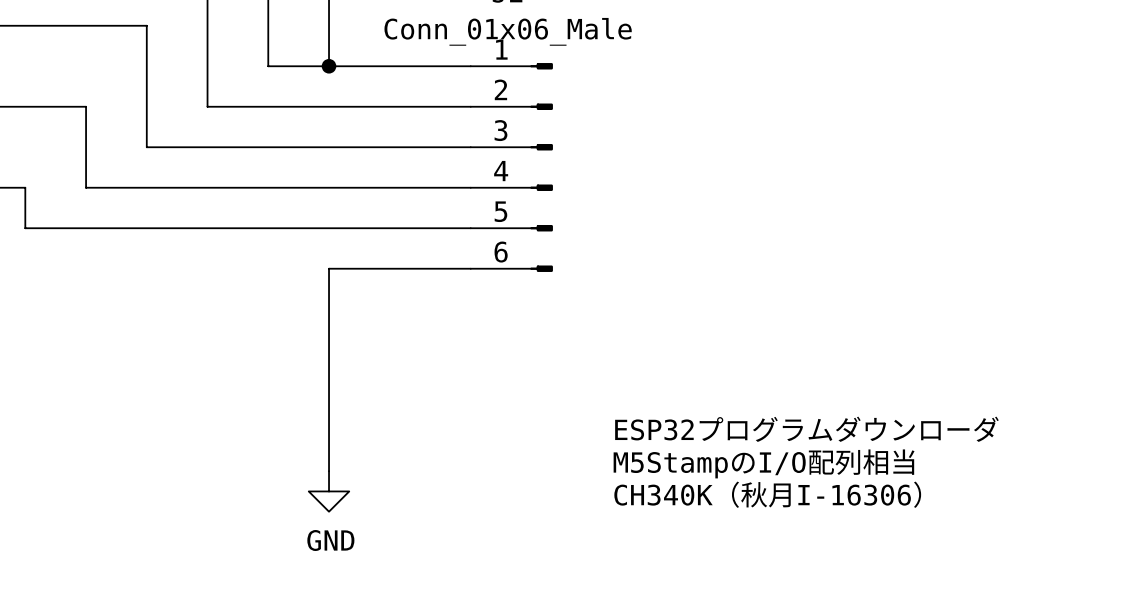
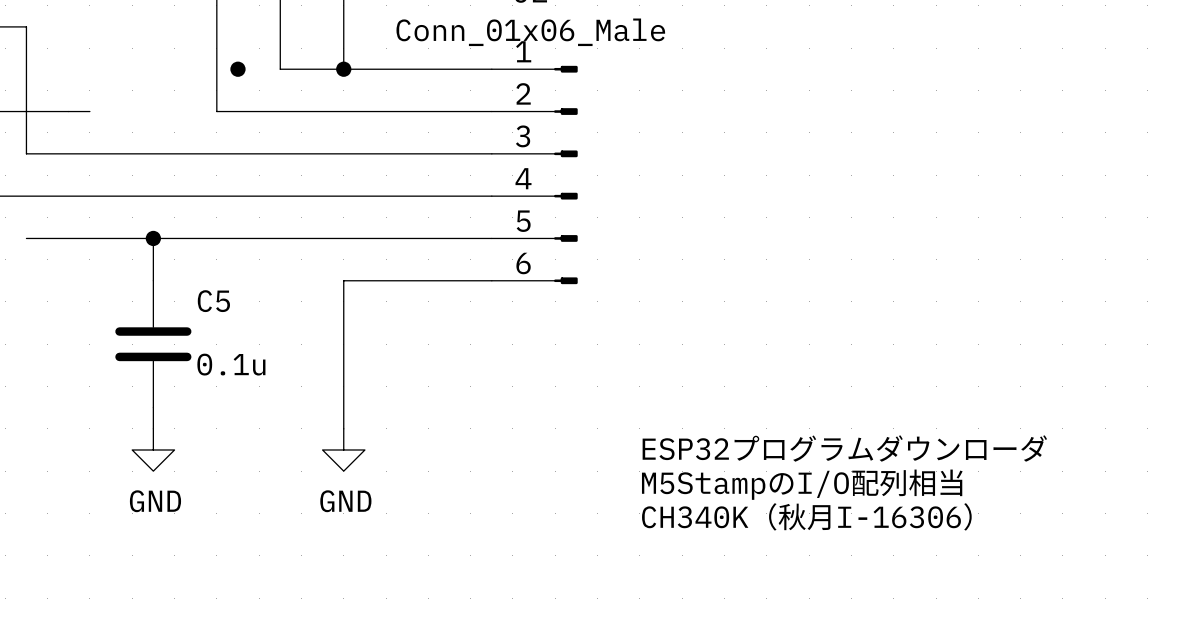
wire: (25, 25) (146, 25) (146, 147) -> (26, 26) (26, 153) (153, 153)
junction: none -> (237, 69)
wire: (86, 106) (86, 187) -> none
wire: (25, 187) (25, 228) -> (26, 196) (89, 196)
wire: none -> (153, 238) (153, 280)
junction: none -> (153, 238)
C5: none -> 0.1u (153, 344)
wire: none -> (153, 407) (153, 428)
wire: (329, 410) (329, 471) -> none
power symbol: none -> GND (153, 449)
power symbol position: GND (329, 491) -> GND (343, 449)

